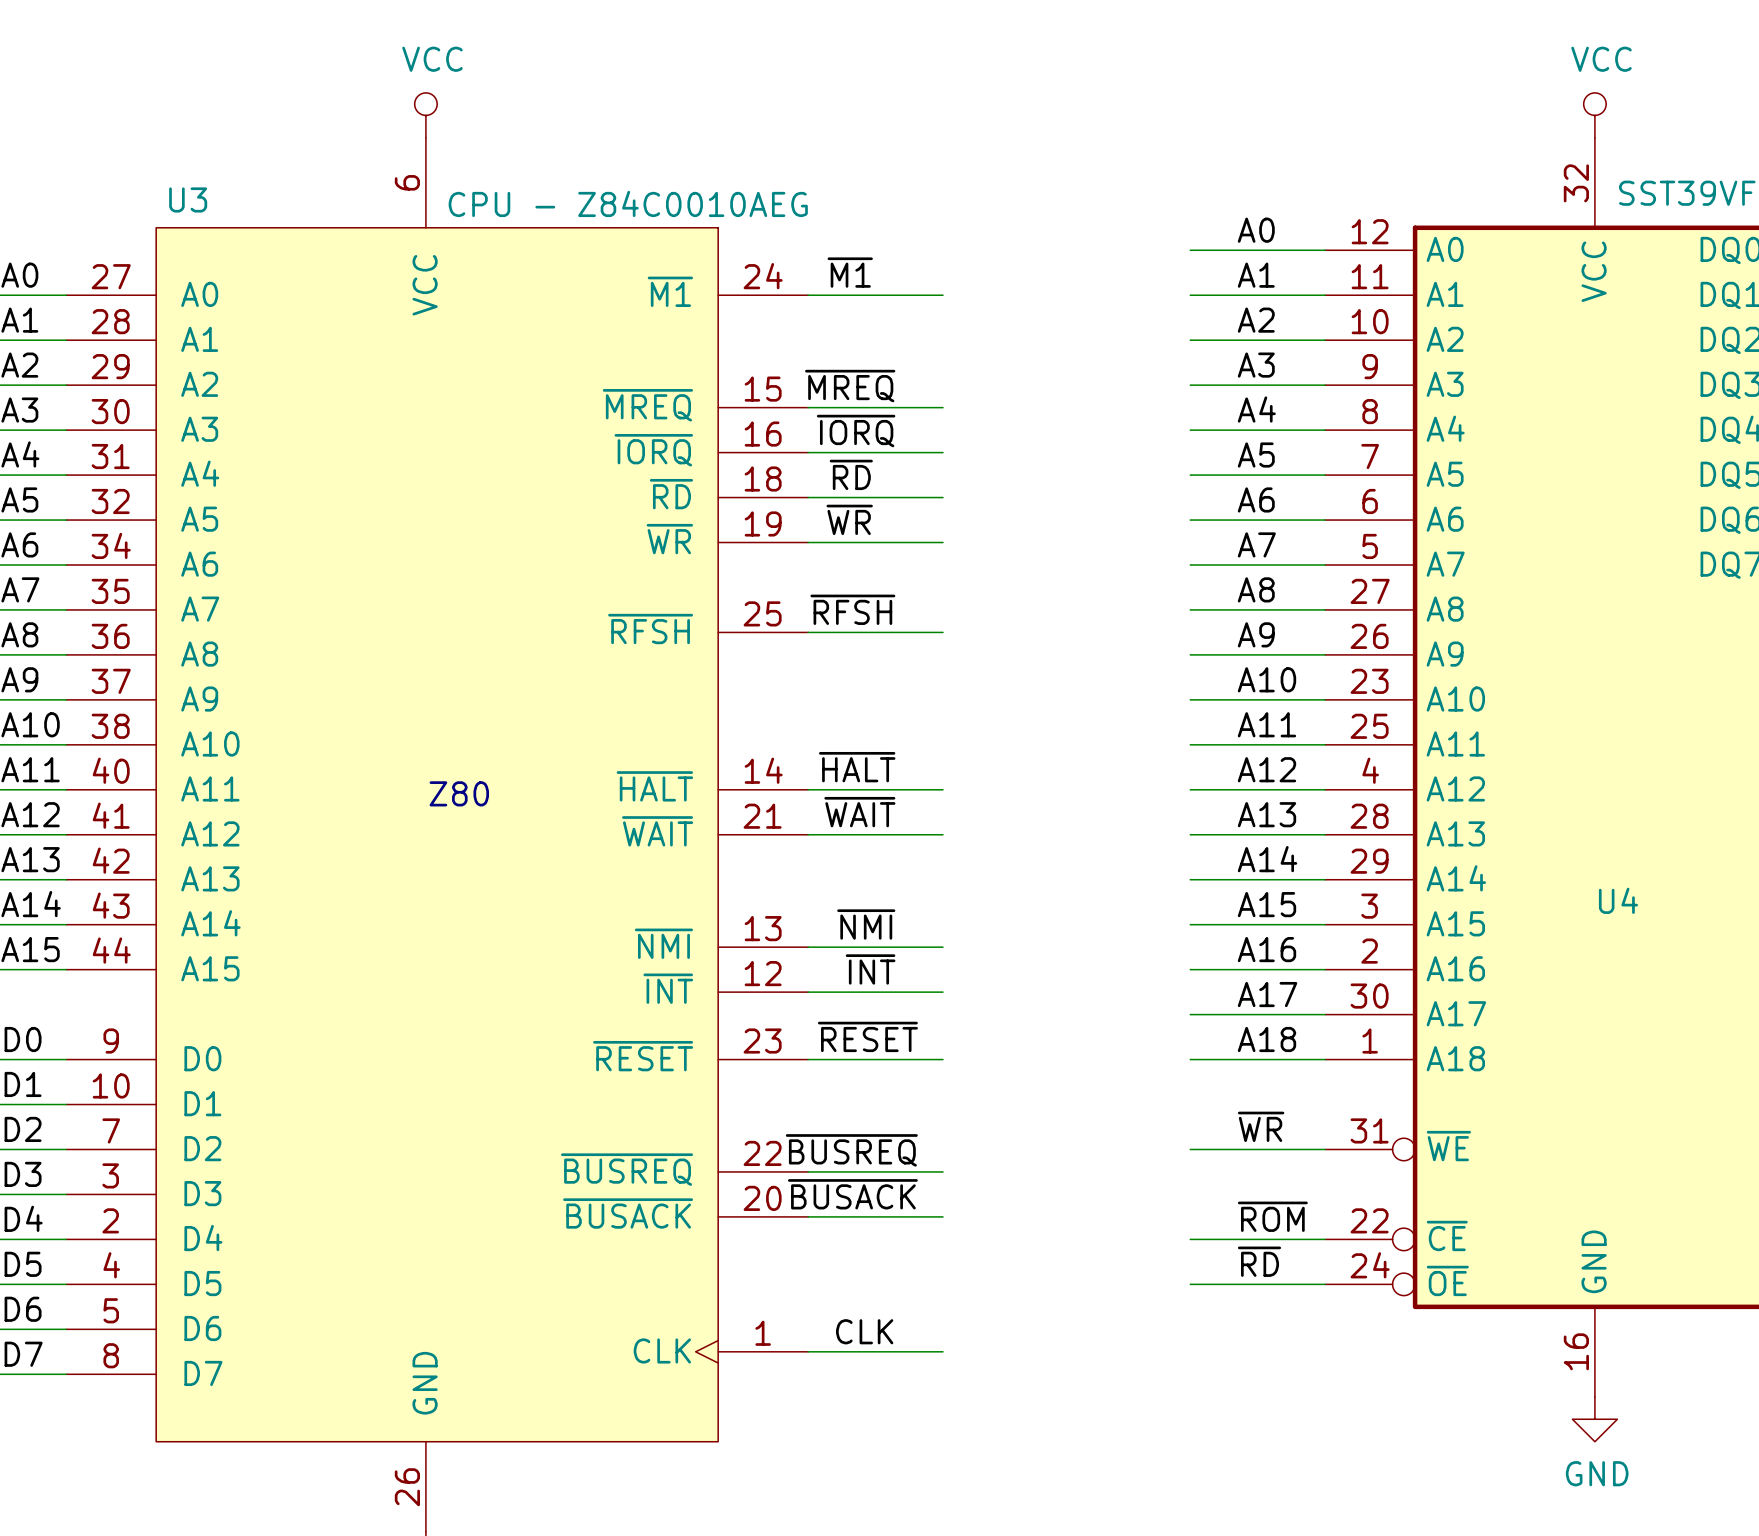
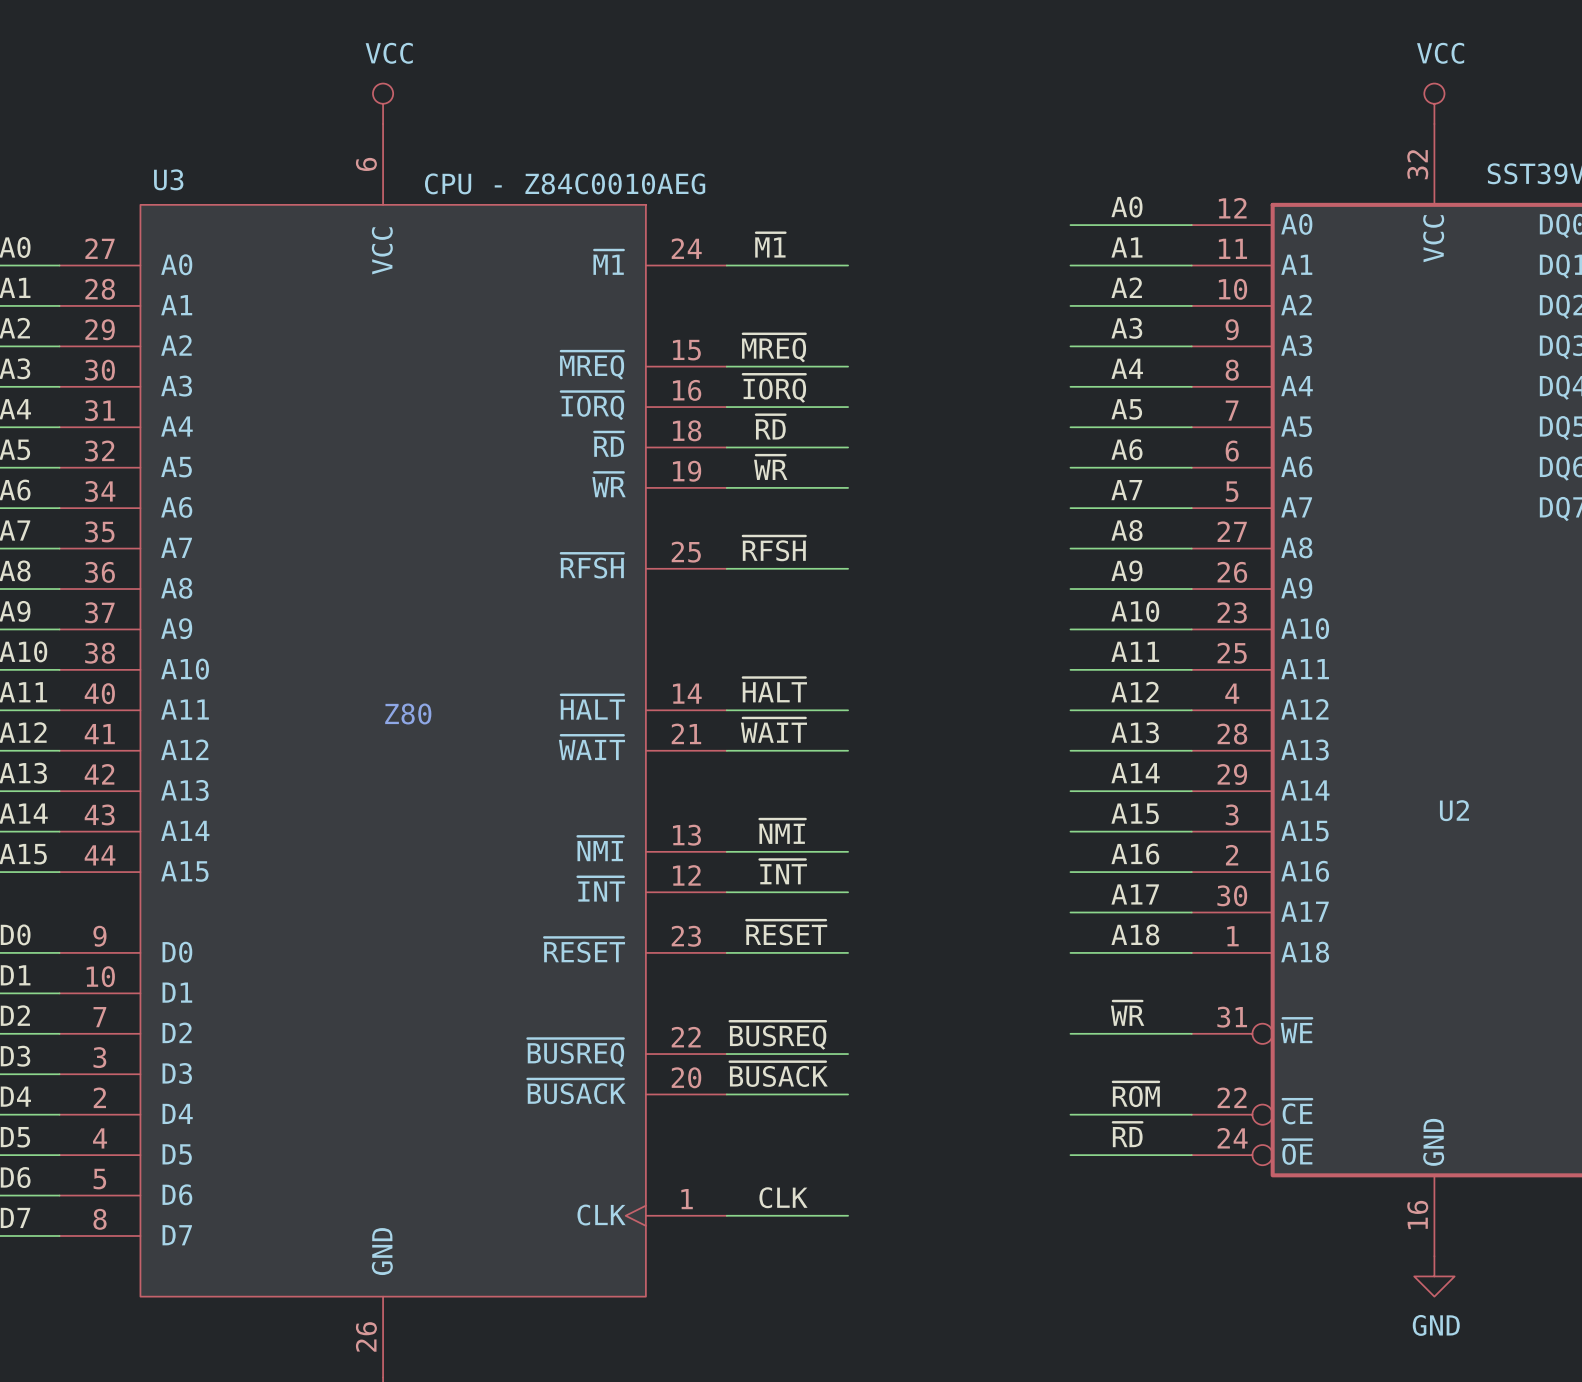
U4 name: U4 (1618, 900) -> U2 (1454, 810)

